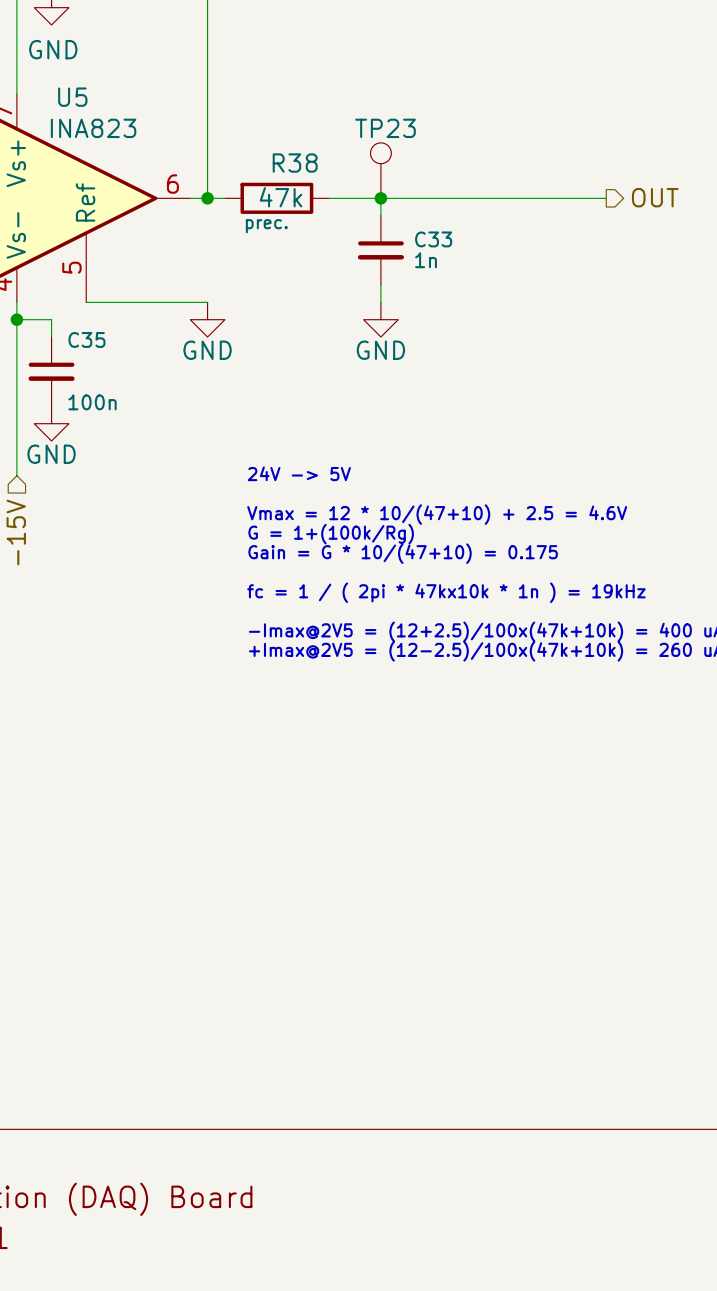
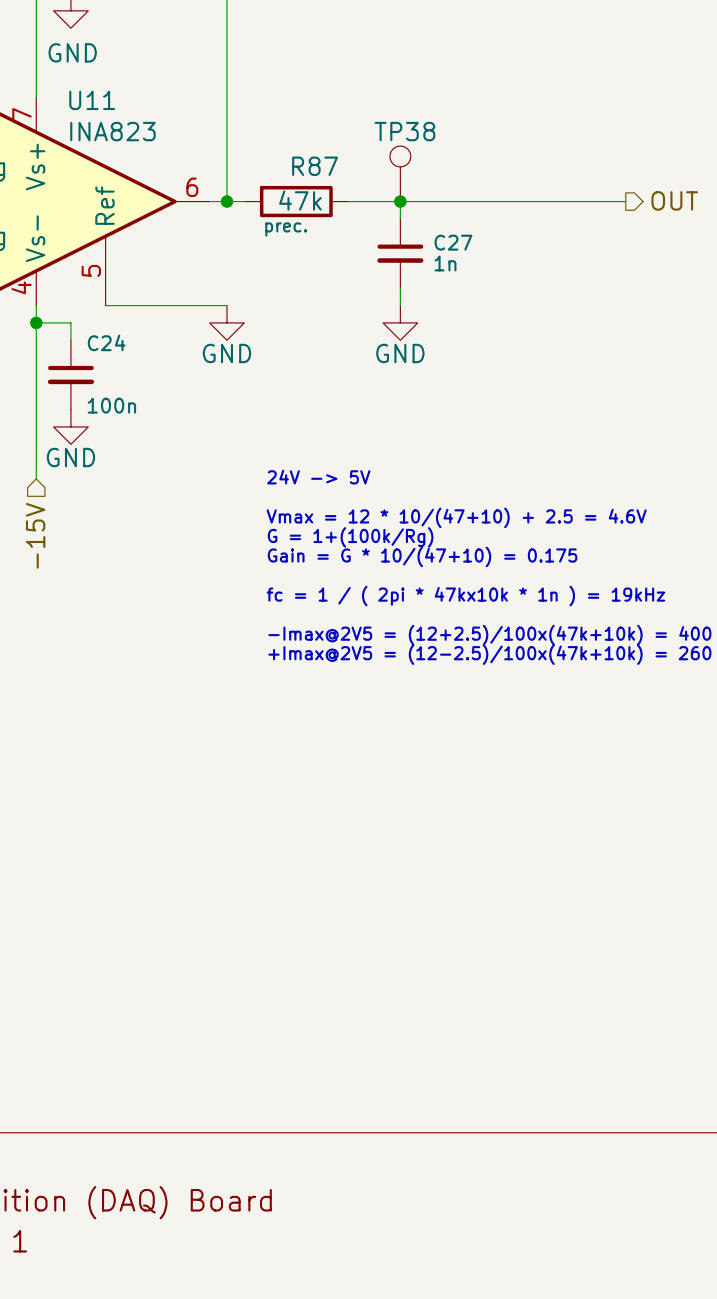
U5 name: U5 (72, 97) -> U11 (92, 100)
TP23 name: TP23 (385, 128) -> TP38 (404, 131)
R38 name: R38 (295, 163) -> R87 (315, 166)
C33 name: C33 (433, 239) -> C27 (453, 242)
C35 name: C35 (86, 339) -> C24 (106, 342)

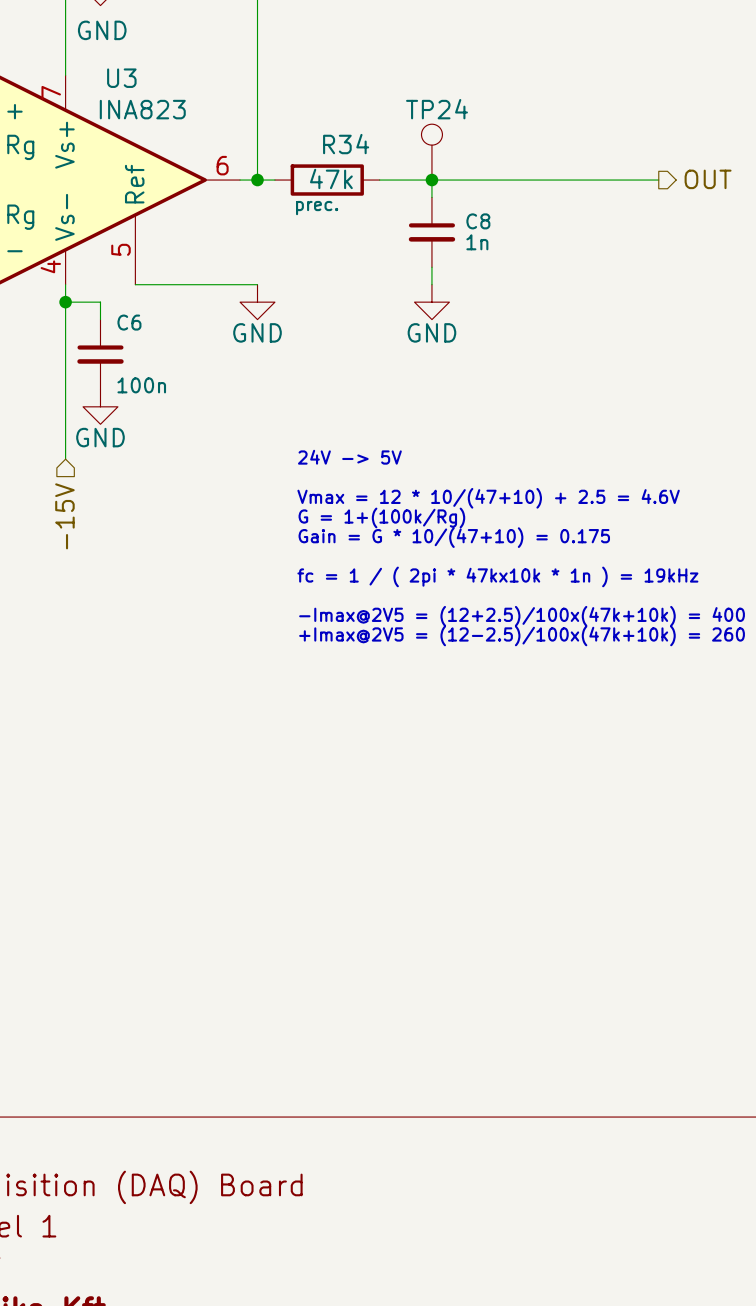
U11 name: U11 (92, 100) -> U3 (121, 78)
TP38 name: TP38 (404, 131) -> TP24 (437, 109)
R87 name: R87 (315, 166) -> R34 (346, 144)
C27 name: C27 (453, 242) -> C8 (478, 221)
C24 name: C24 (106, 342) -> C6 (129, 322)

